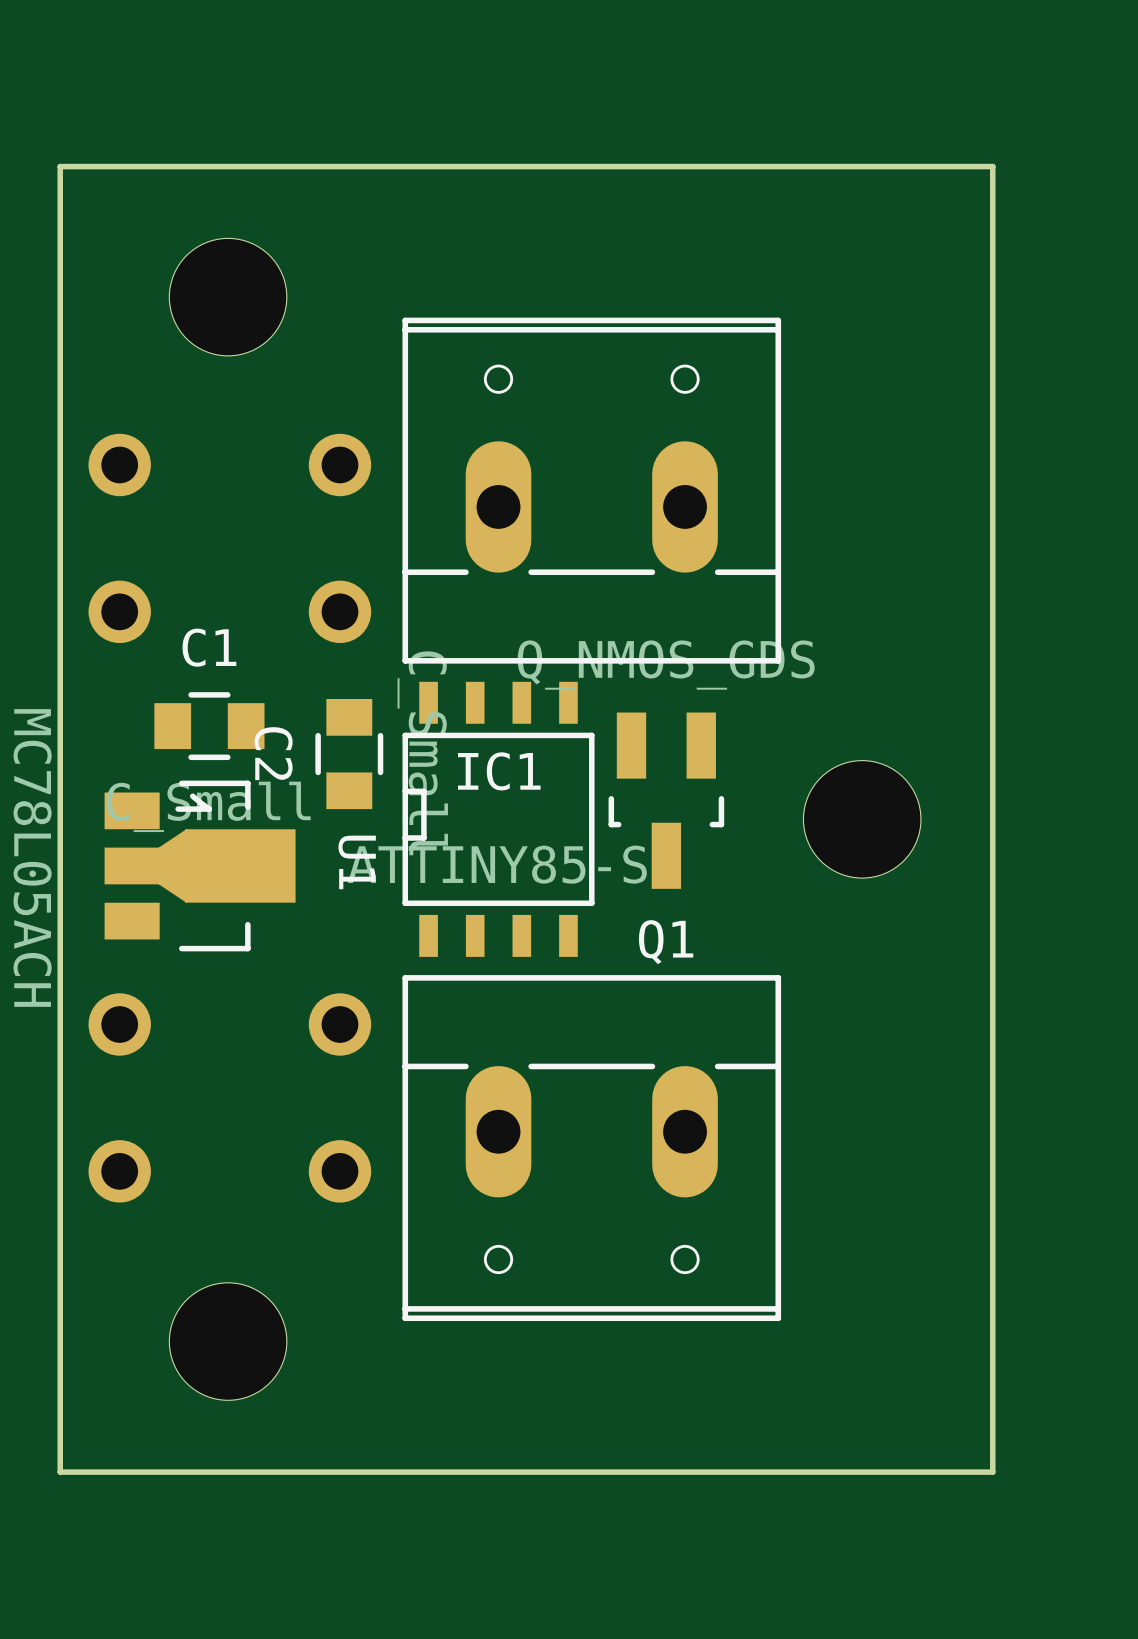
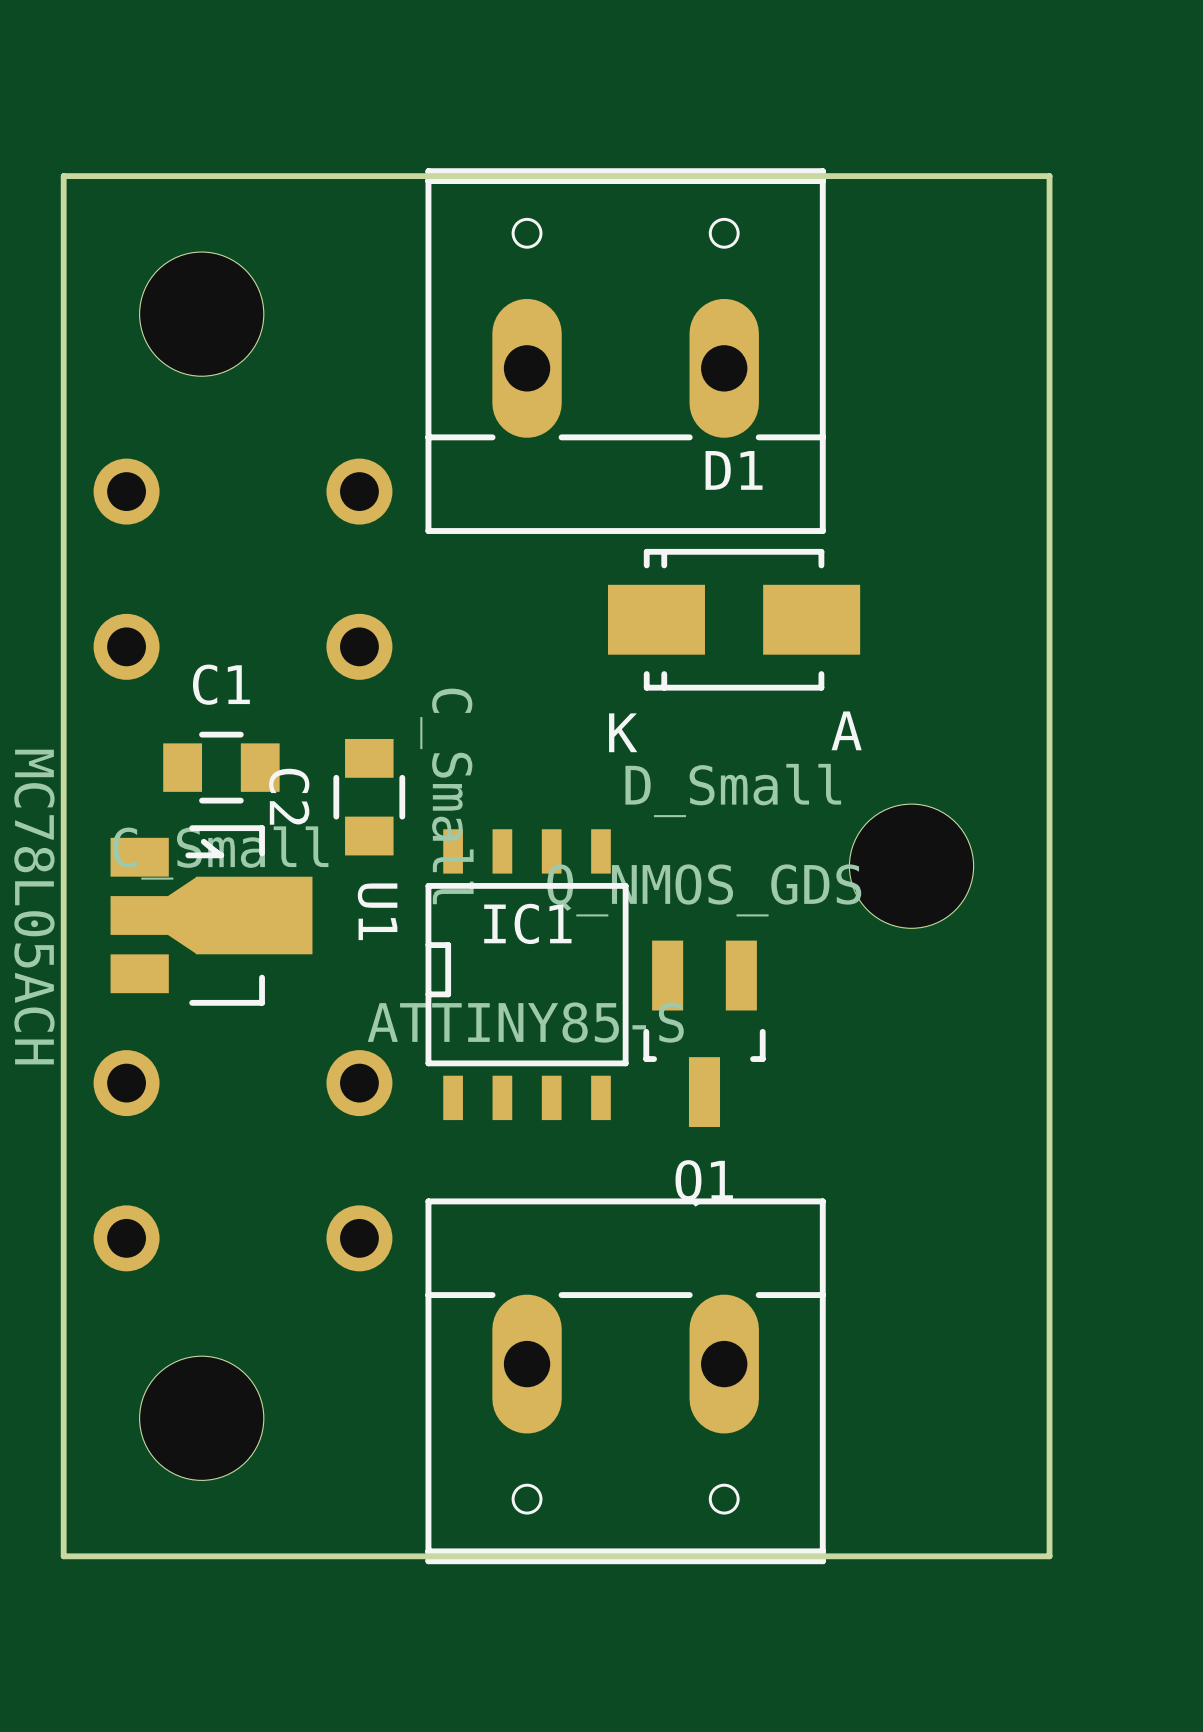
part position: (228, 297) -> (201, 314)
part position: (591, 490) -> (625, 351)
D1: none -> D_Small (734, 619)
Q1 position: (666, 800) -> (704, 1033)
IC1 position: (498, 819) -> (527, 974)
part position: (591, 1148) -> (625, 1381)
part position: (228, 1341) -> (201, 1418)

